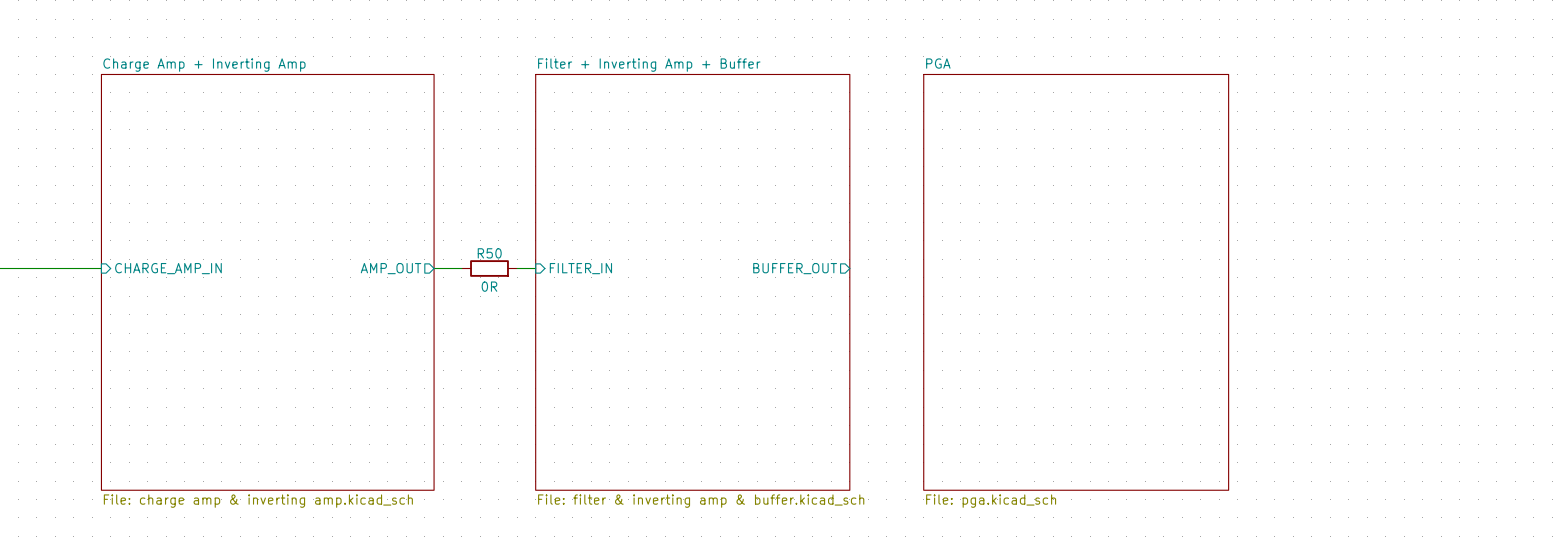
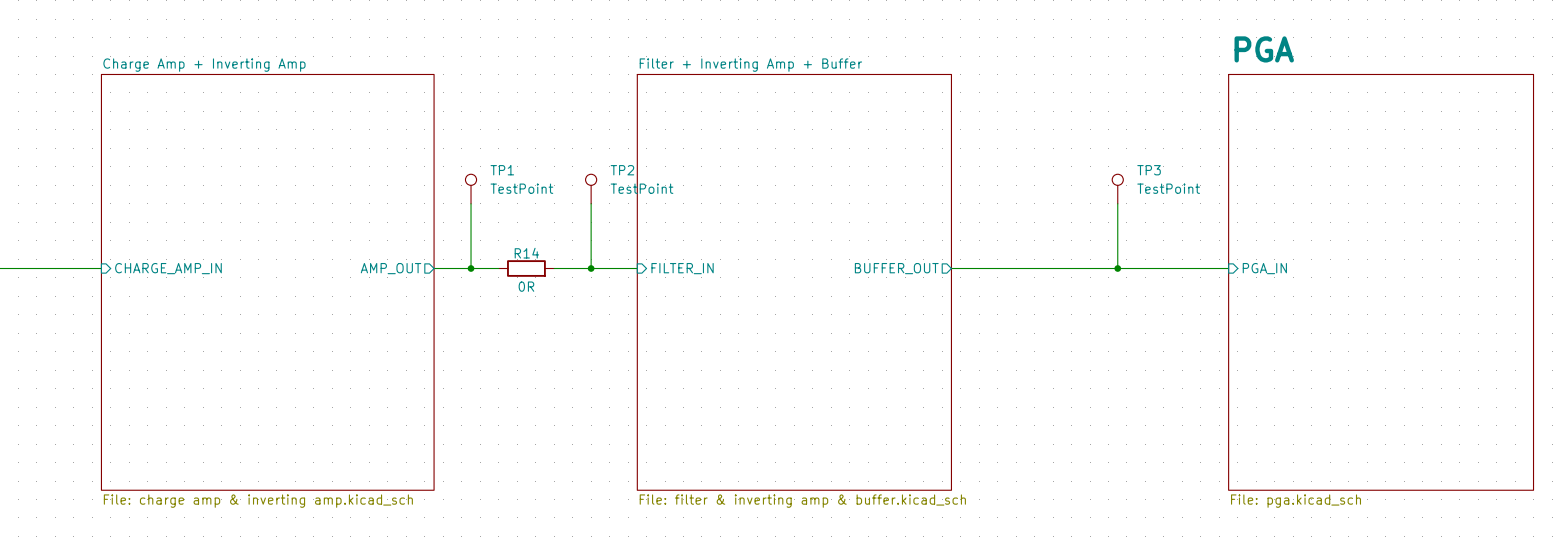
TP1: none -> TestPoint (471, 189)
TP2: none -> TestPoint (591, 189)
TP3: none -> TestPoint (1117, 189)
wire: none -> (471, 203) (471, 268)
wire: none -> (591, 203) (591, 268)
wire: none -> (1117, 203) (1117, 268)
wire: none -> (461, 268) (498, 268)
junction: none -> (471, 268)
R50: 0R (489, 268) -> none
wire: (517, 268) (535, 268) -> none
R14: none -> 0R (526, 268)
wire: none -> (554, 268) (637, 268)
sheet pin position: FILTER_IN (580, 268) -> FILTER_IN (682, 268)
junction: none -> (591, 268)
sheet pin position: BUFFER_OUT (795, 268) -> BUFFER_OUT (896, 268)
wire: none -> (951, 268) (1228, 268)
junction: none -> (1117, 268)
sheet pin: none -> PGA_IN (1264, 268)
sheet Filter + Inverting Amp + Buffer position: (692, 282) -> (794, 282)
sheet PGA: File: pga.kicad_sch (1076, 282) -> none
sheet PGA: none -> File: pga.kicad_sch (1381, 282)

